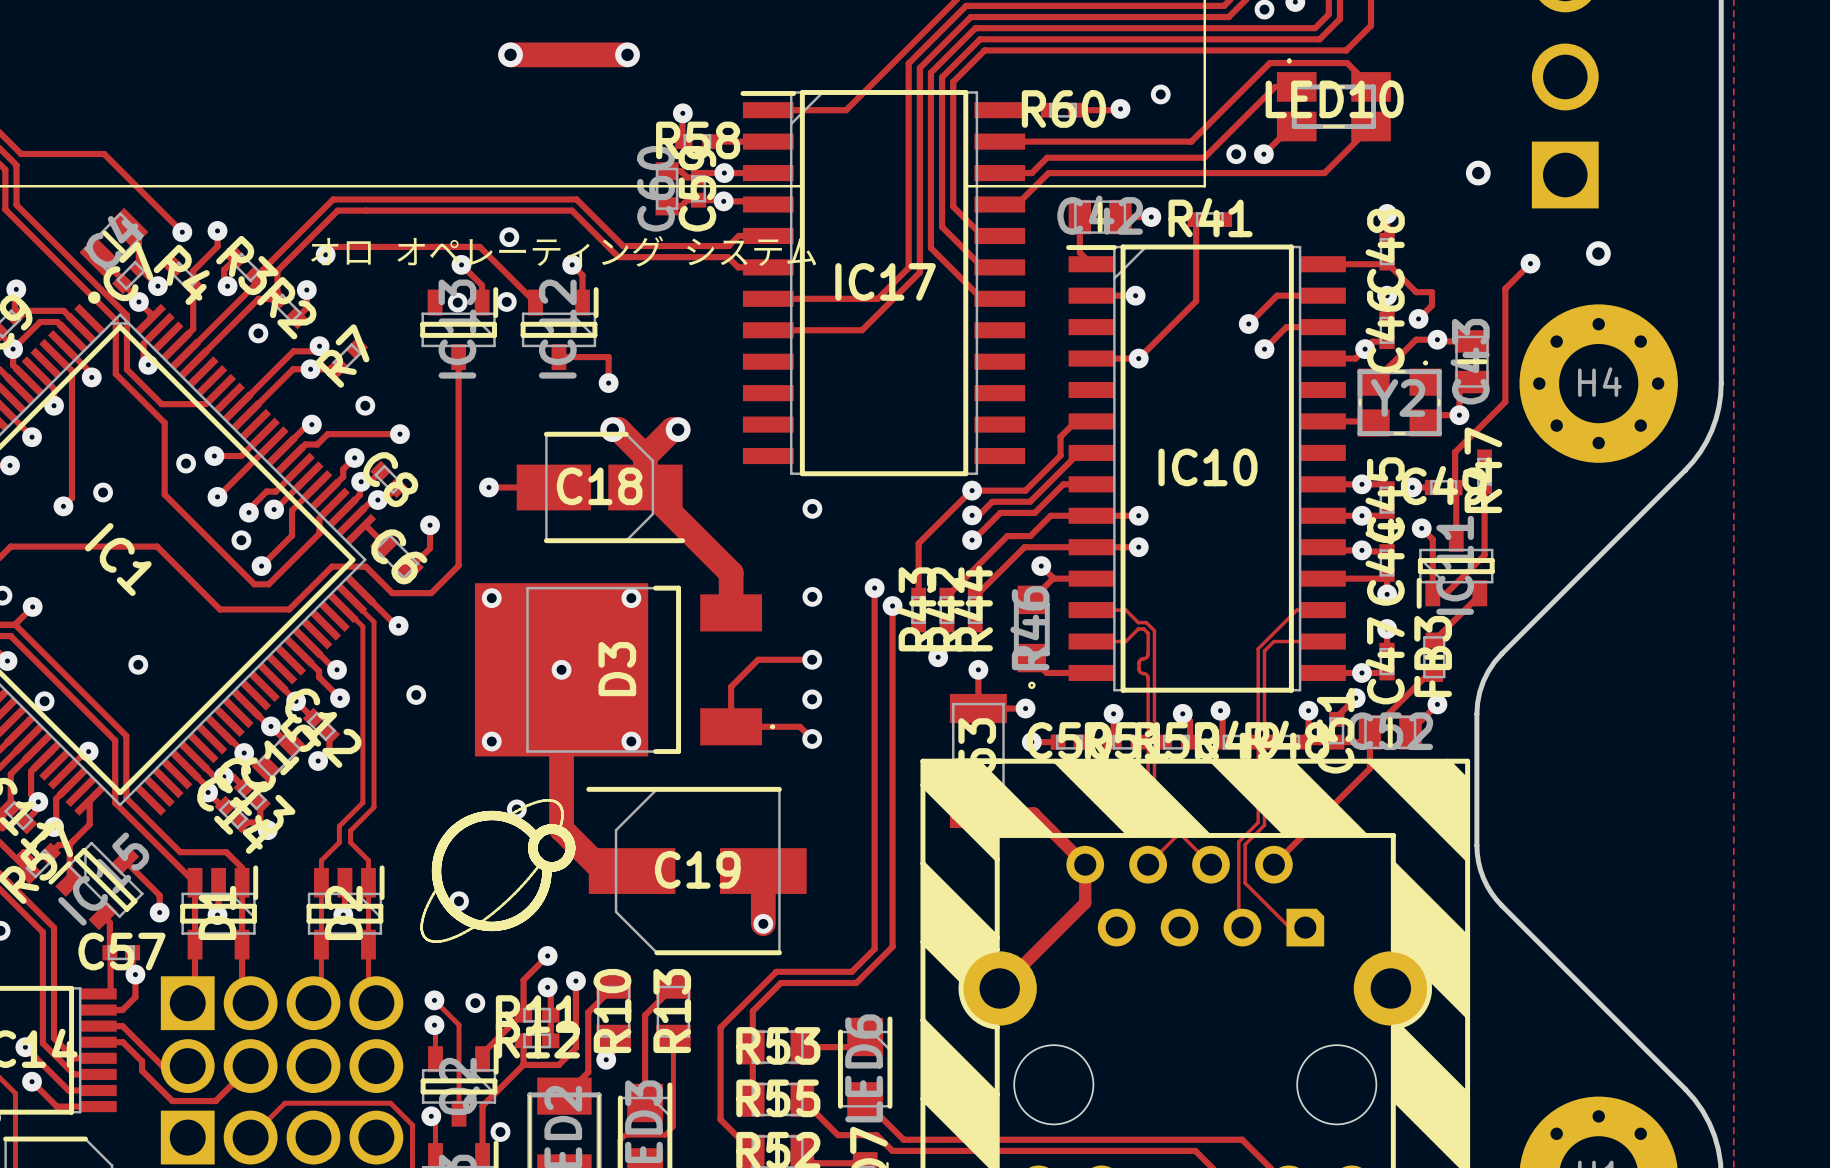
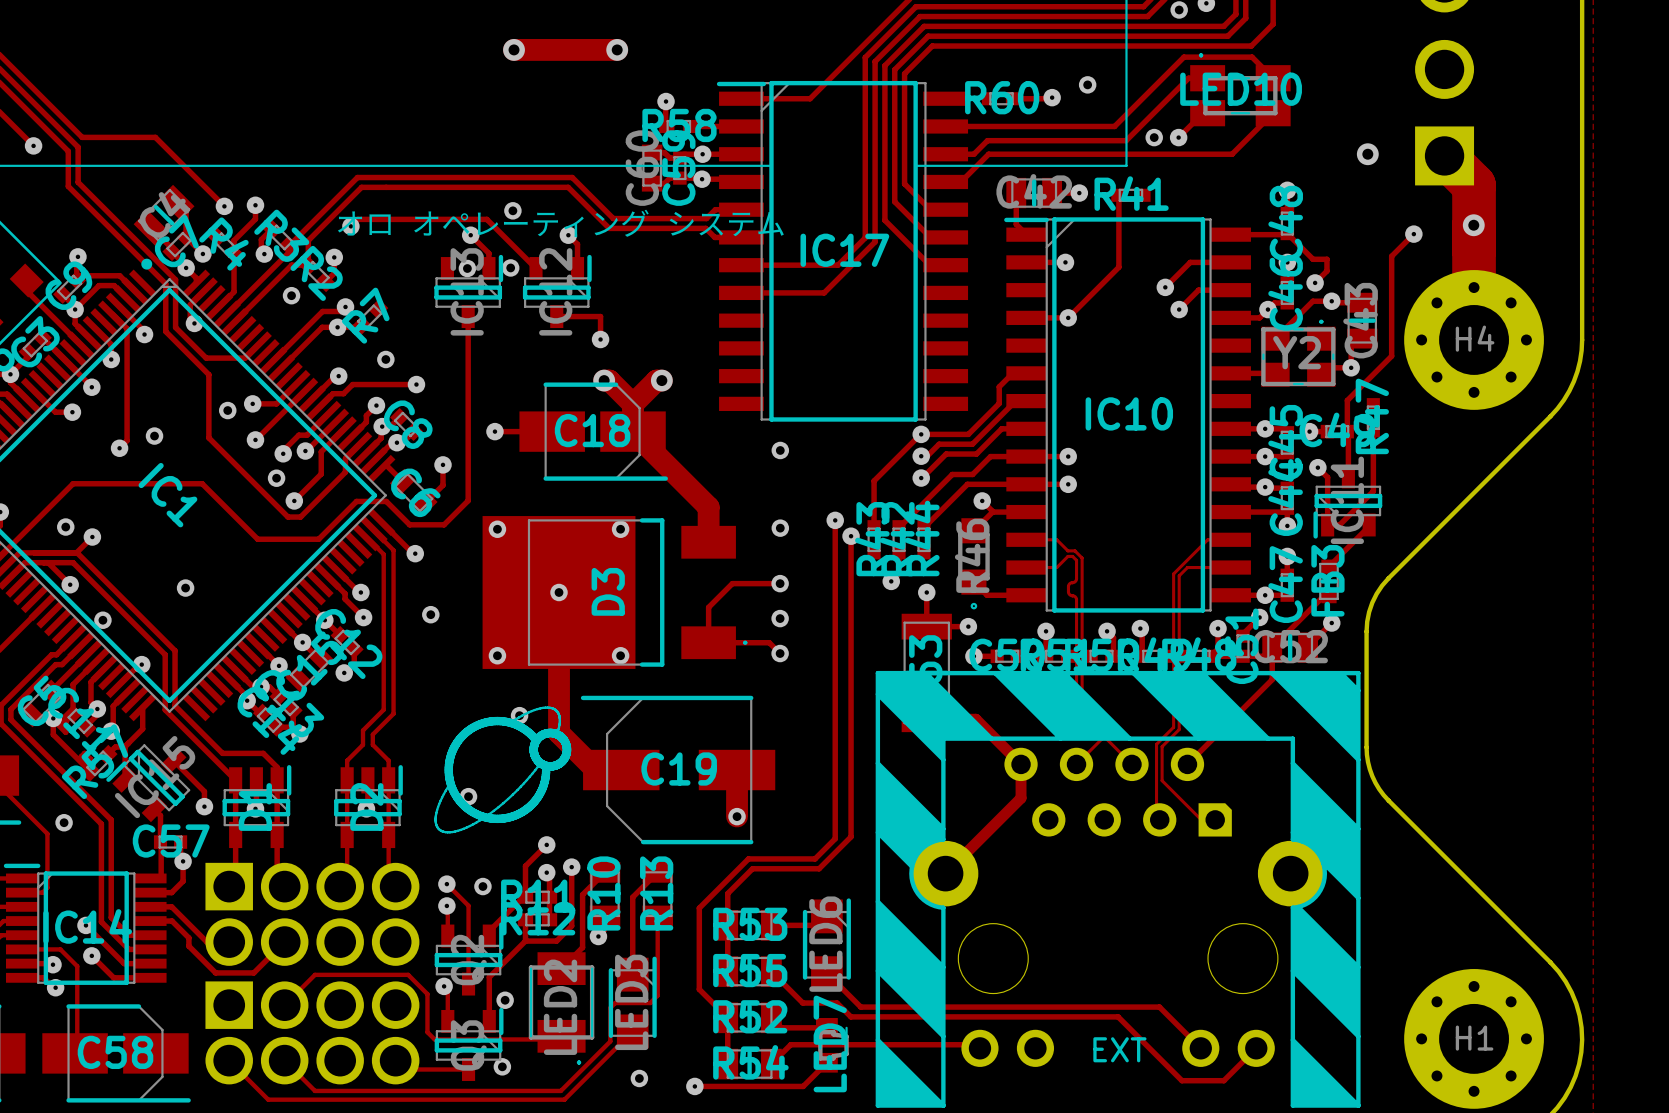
track: none -> (1444, 155) (1474, 185) (1474, 287)

